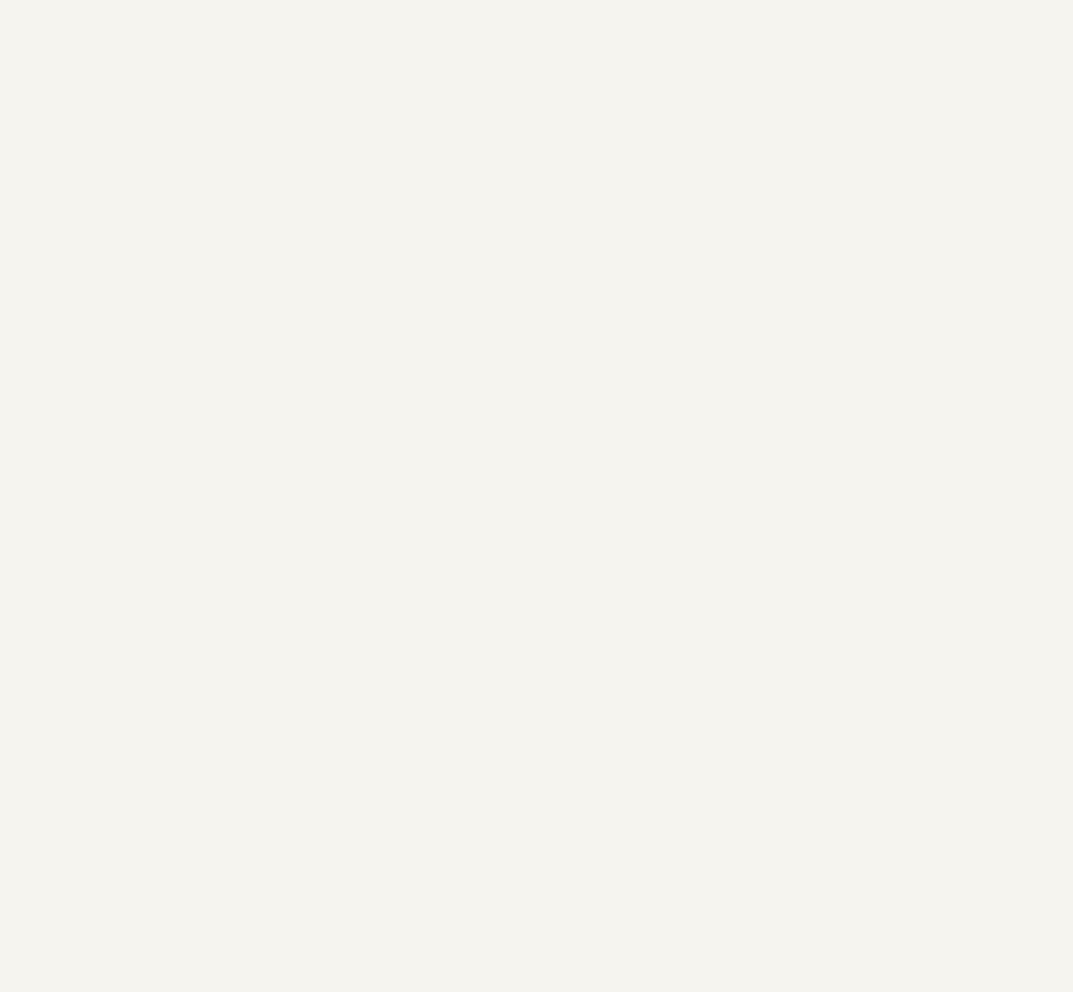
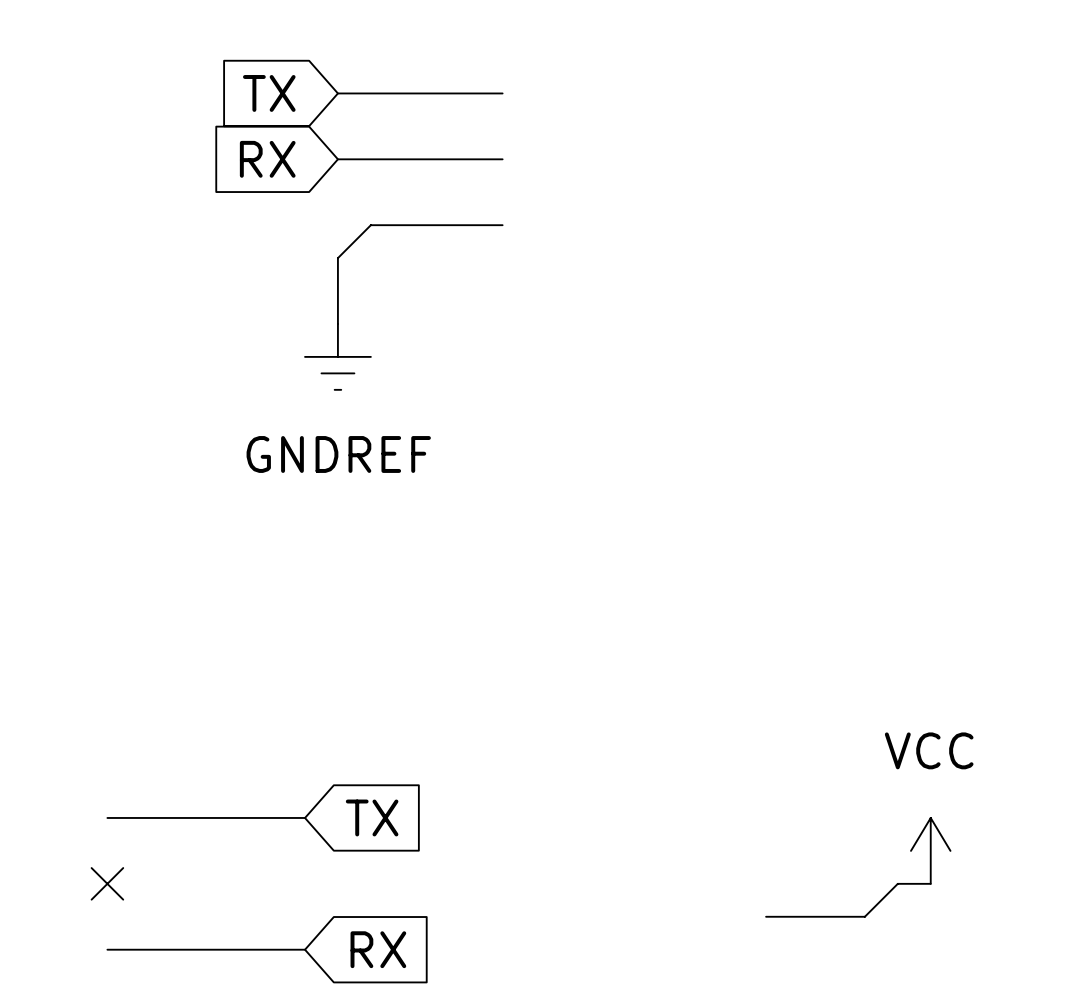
global label: none -> TX (269, 93)
wire: none -> (337, 93) (502, 93)
global label: none -> RX (267, 159)
wire: none -> (337, 159) (502, 159)
wire: none -> (502, 225) (370, 225) (337, 258) (337, 323)
power symbol: none -> GNDREF (337, 356)
wire: none -> (107, 817) (305, 817)
global label: none -> TX (372, 817)
power symbol: none -> VCC (930, 850)
no-connect mark: none -> (107, 883)
wire: none -> (930, 883) (897, 883) (864, 916) (766, 916)
wire: none -> (107, 949) (305, 949)
global label: none -> RX (378, 949)

